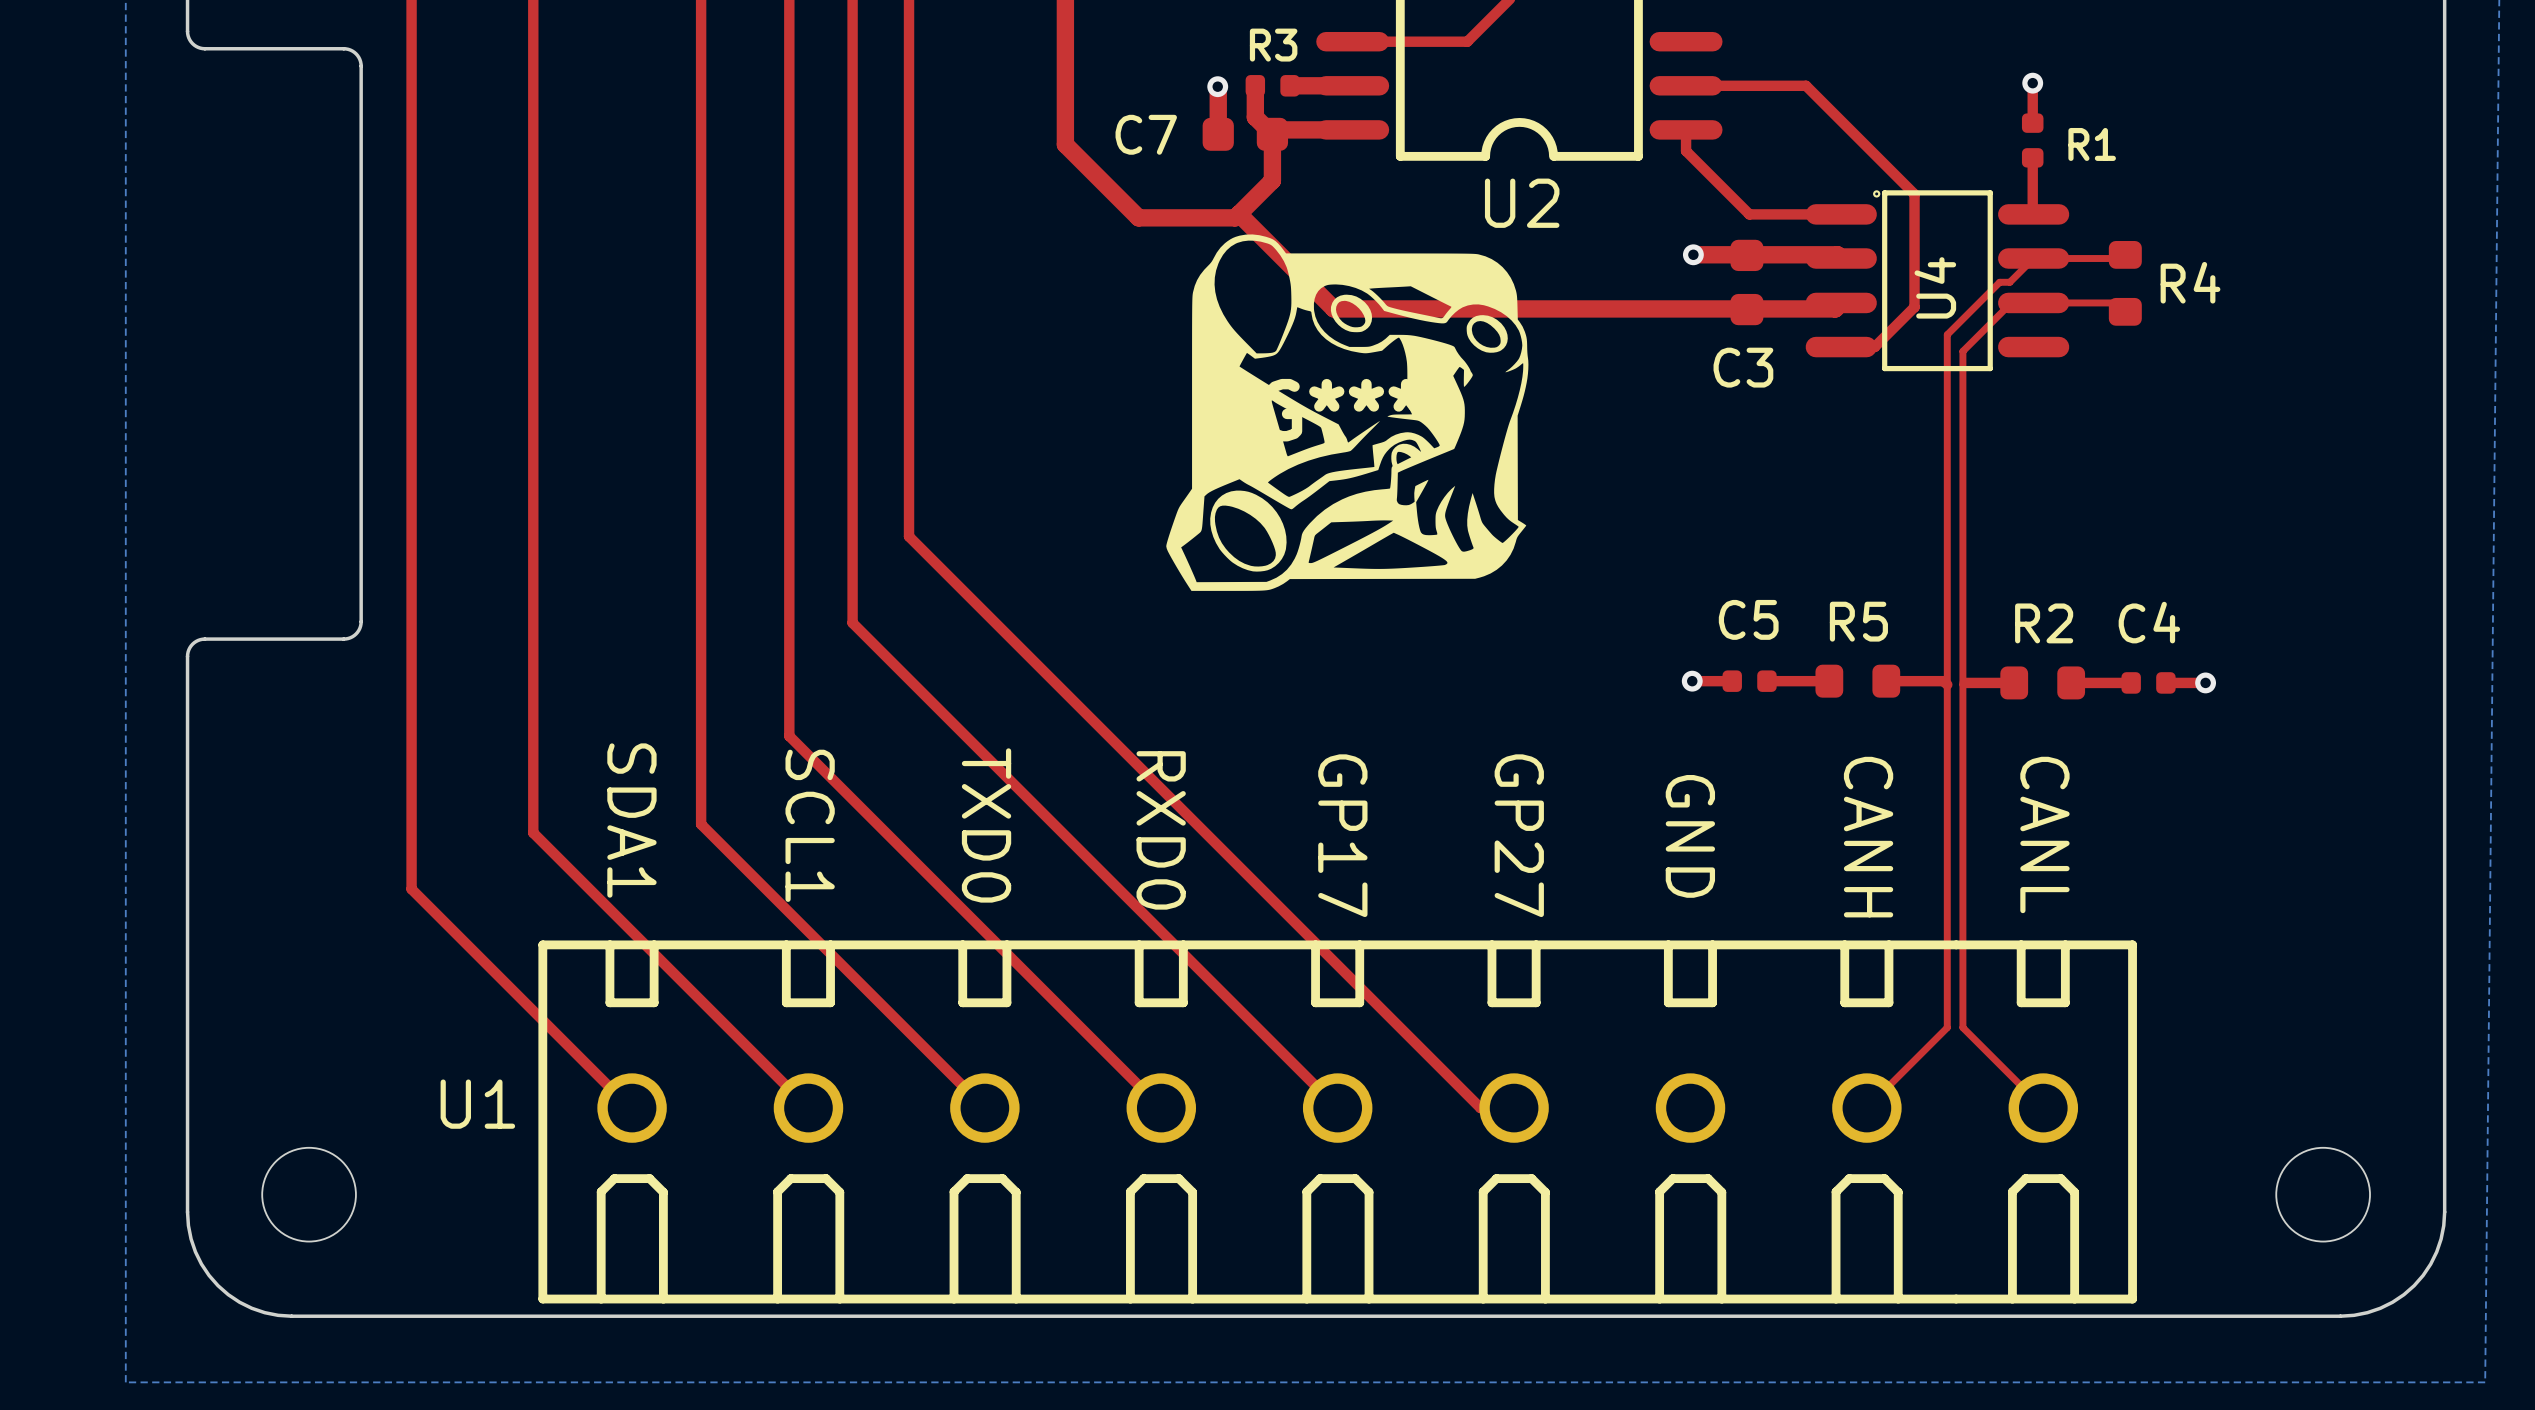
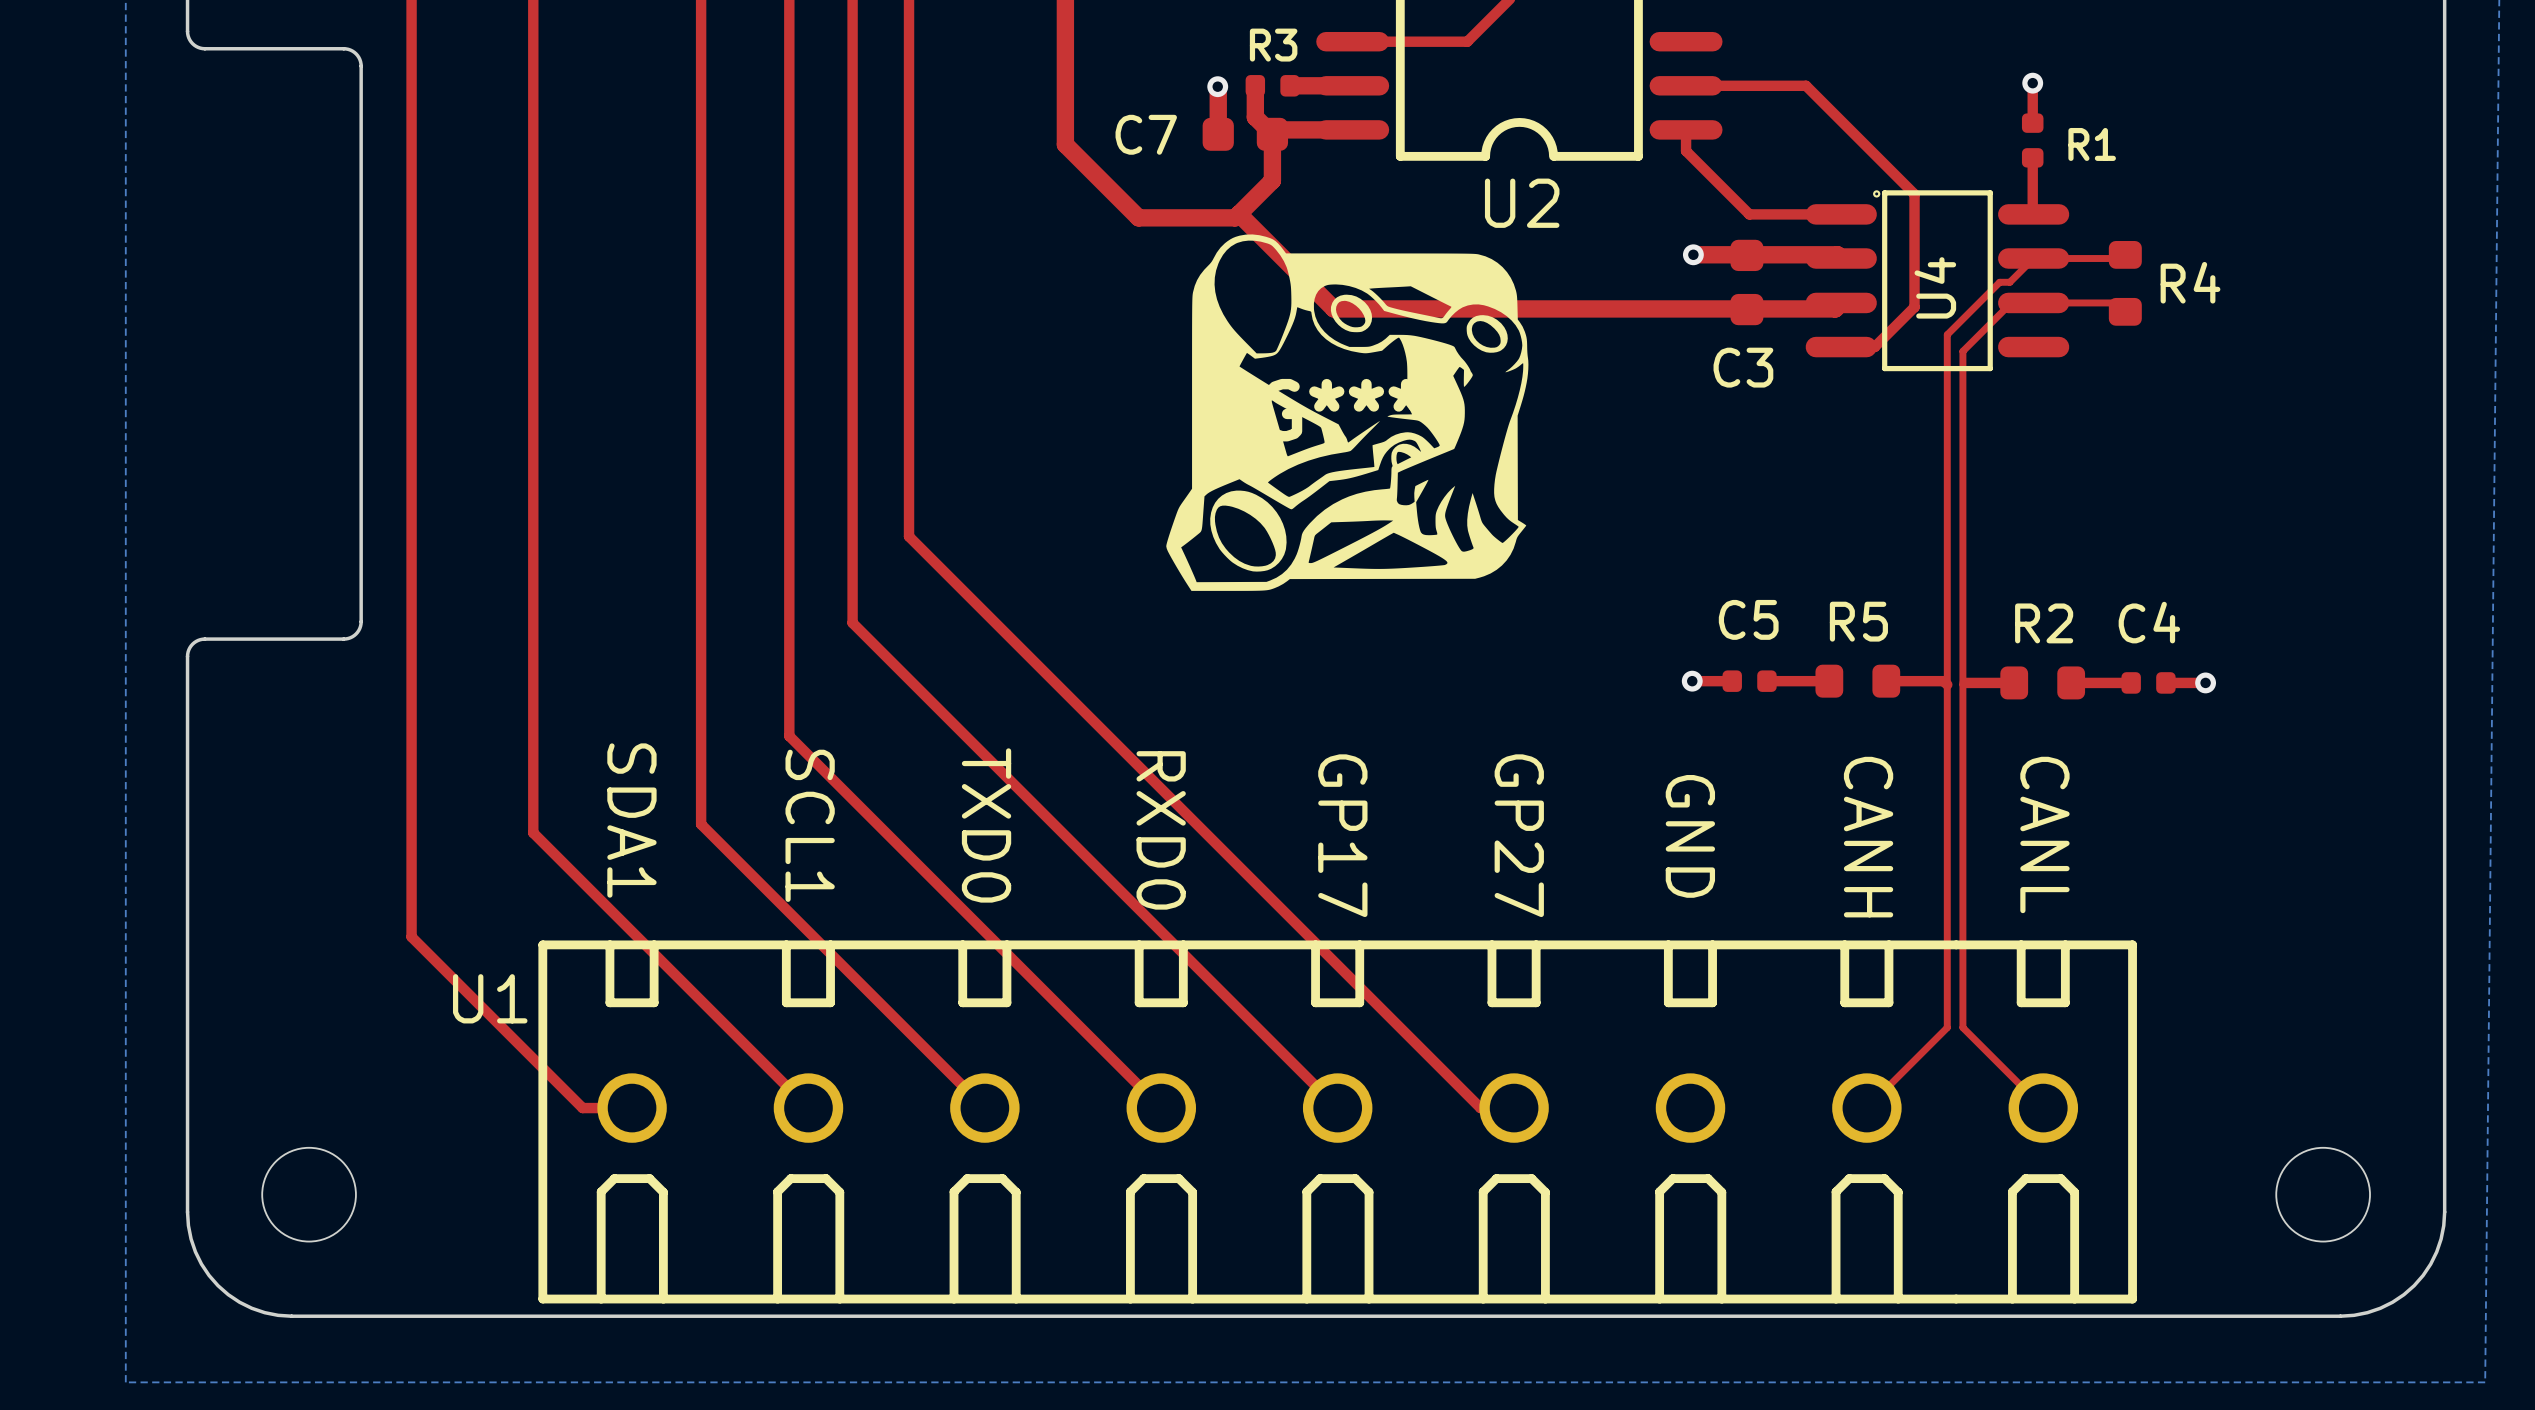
top track: (411, 889) (630, 1108) -> (411, 889) (411, 936) (582, 1108) (630, 1108)
U1 name position: U1 (477, 1104) -> U1 (490, 998)

